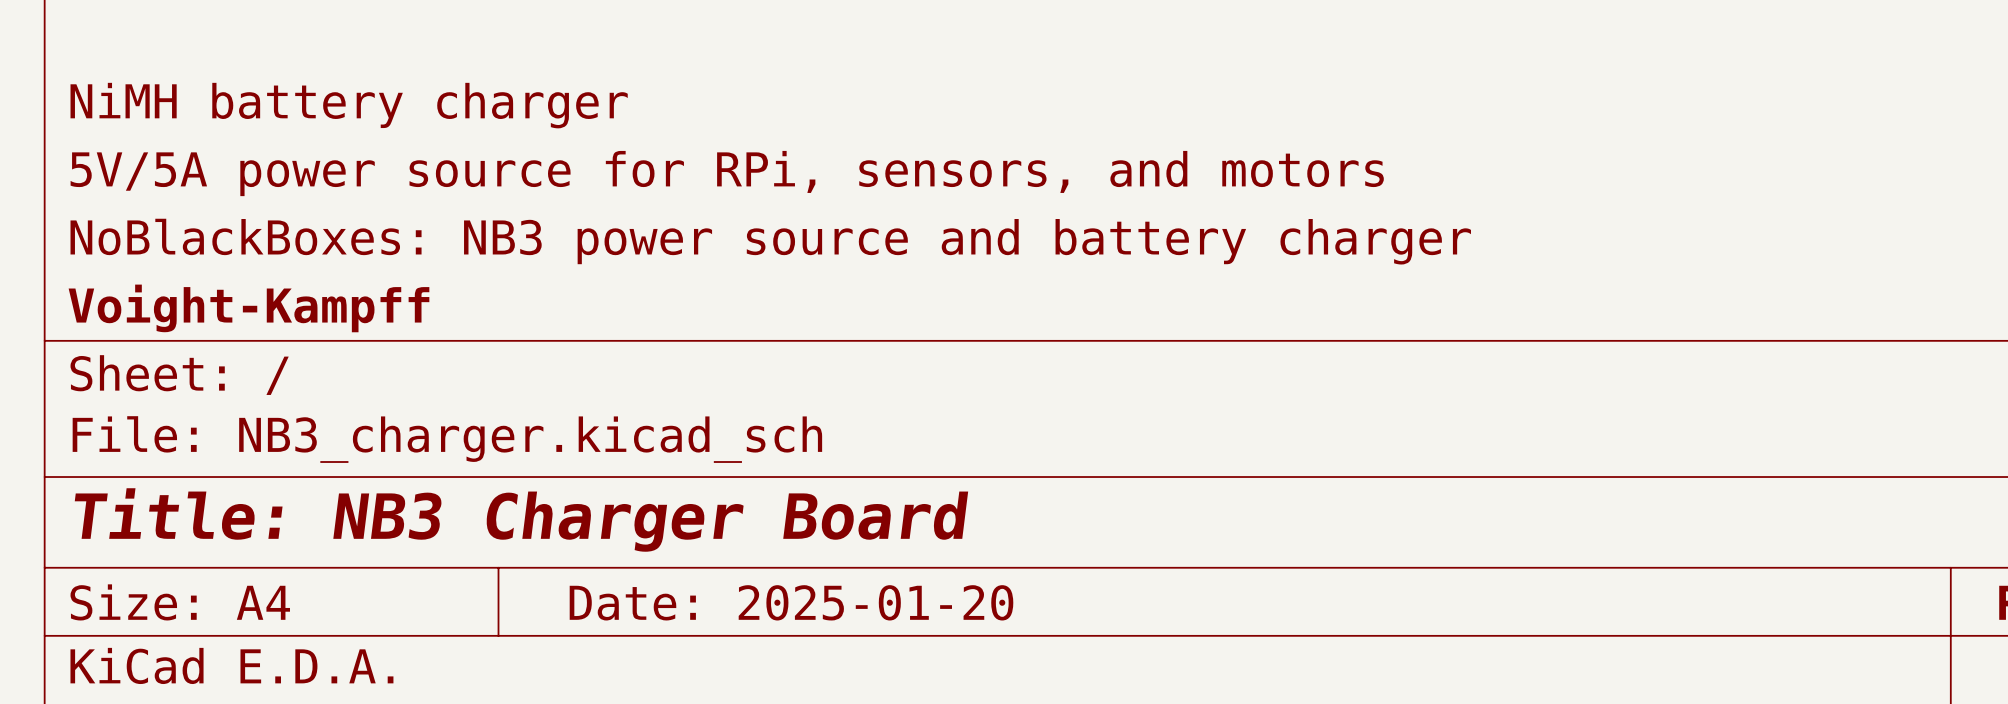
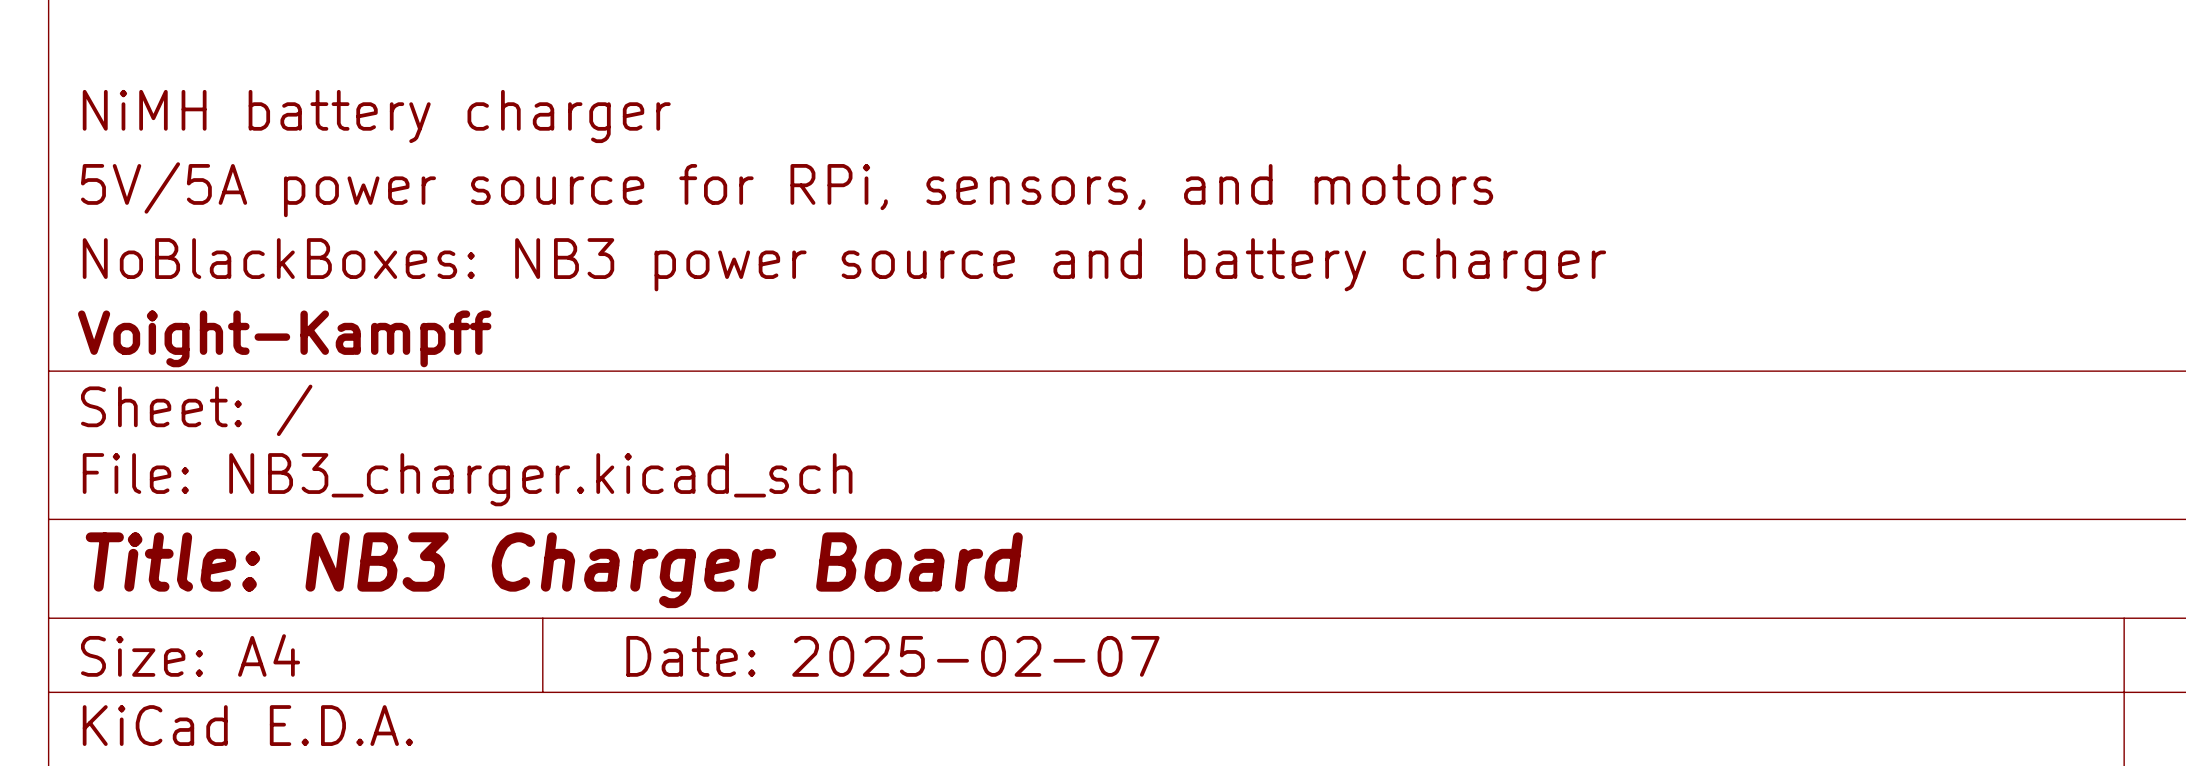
title block: Date: 2025-01-20 (791, 602) -> Date: 2025-02-07 (892, 656)

